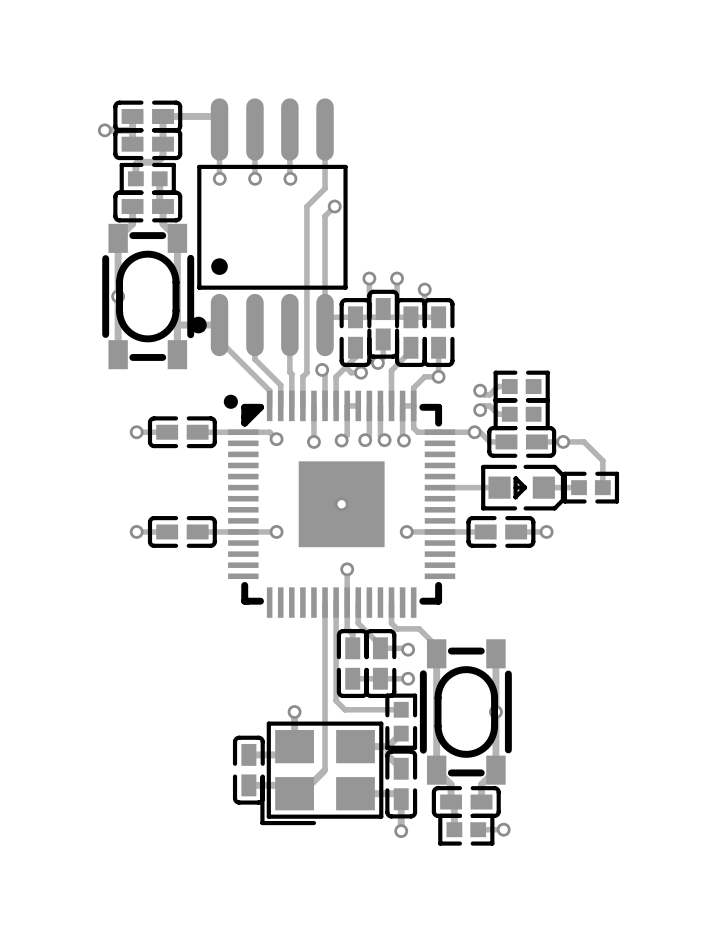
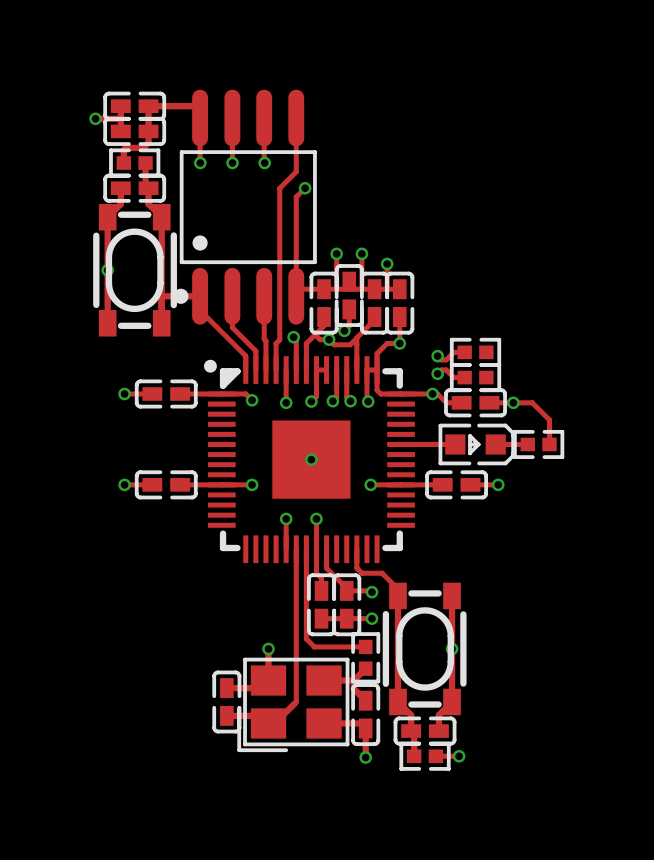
track: none -> (357, 337) (350, 344) (334, 344) (329, 339)
track: none -> (286, 518) (286, 549)
via: none -> (286, 518)

